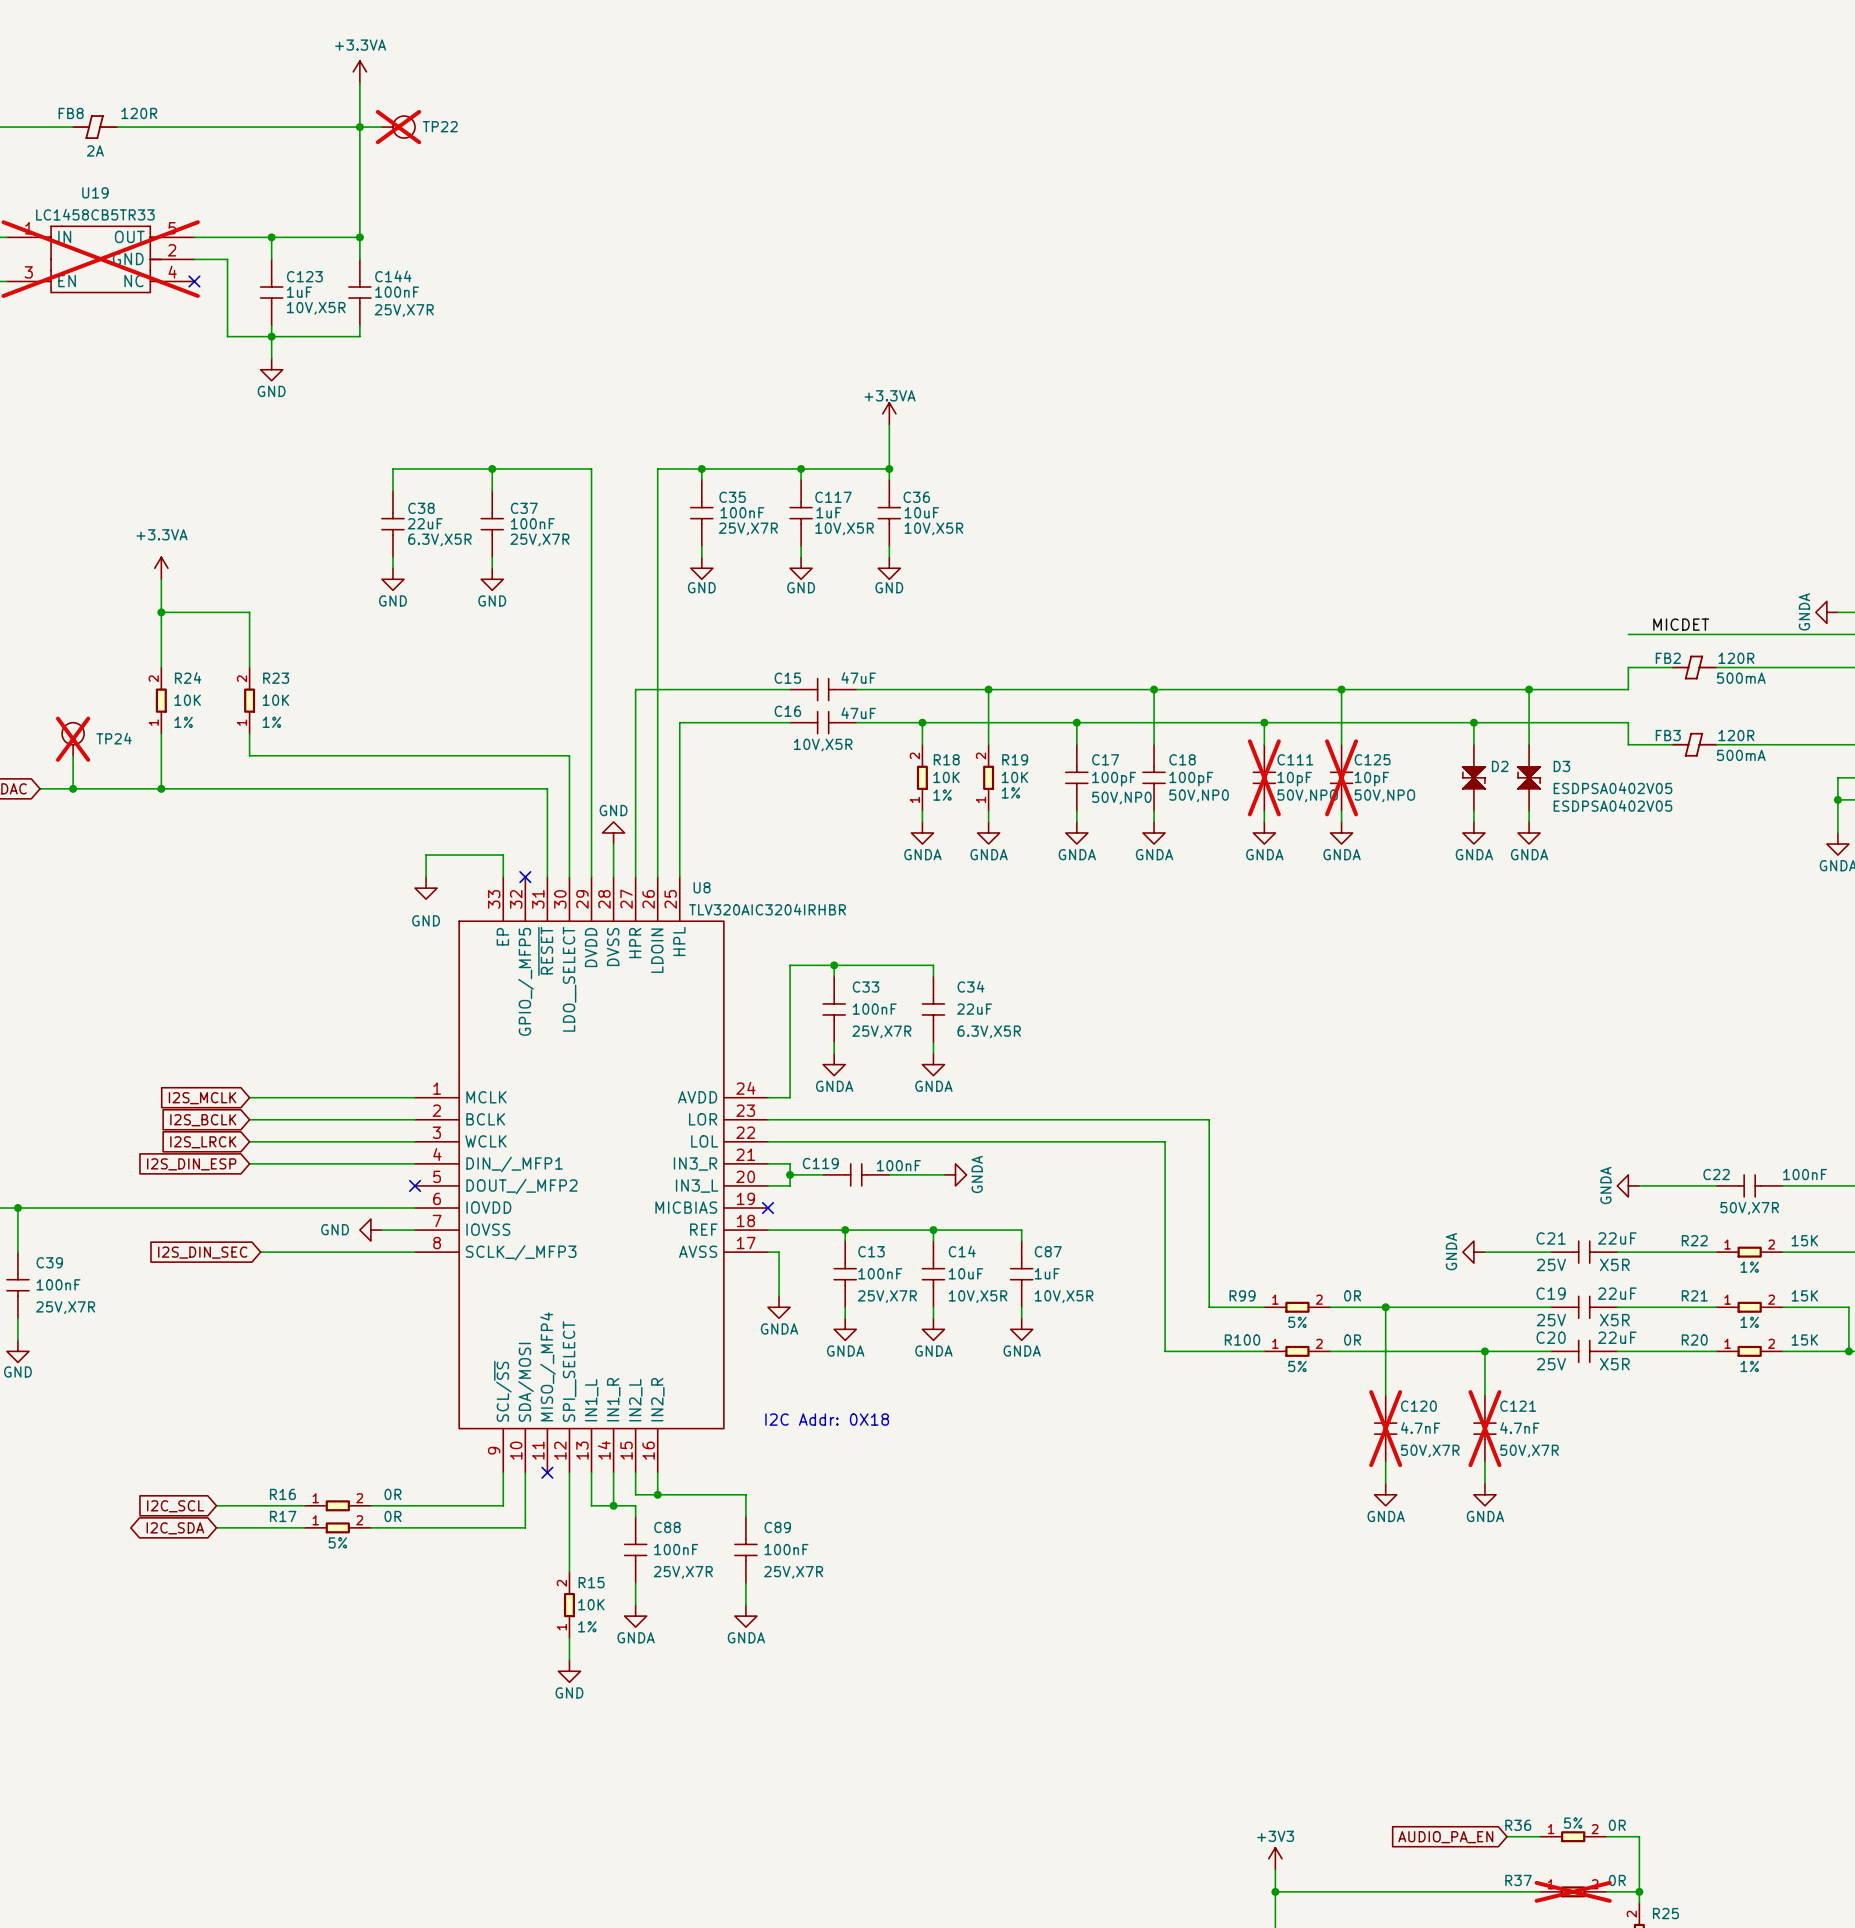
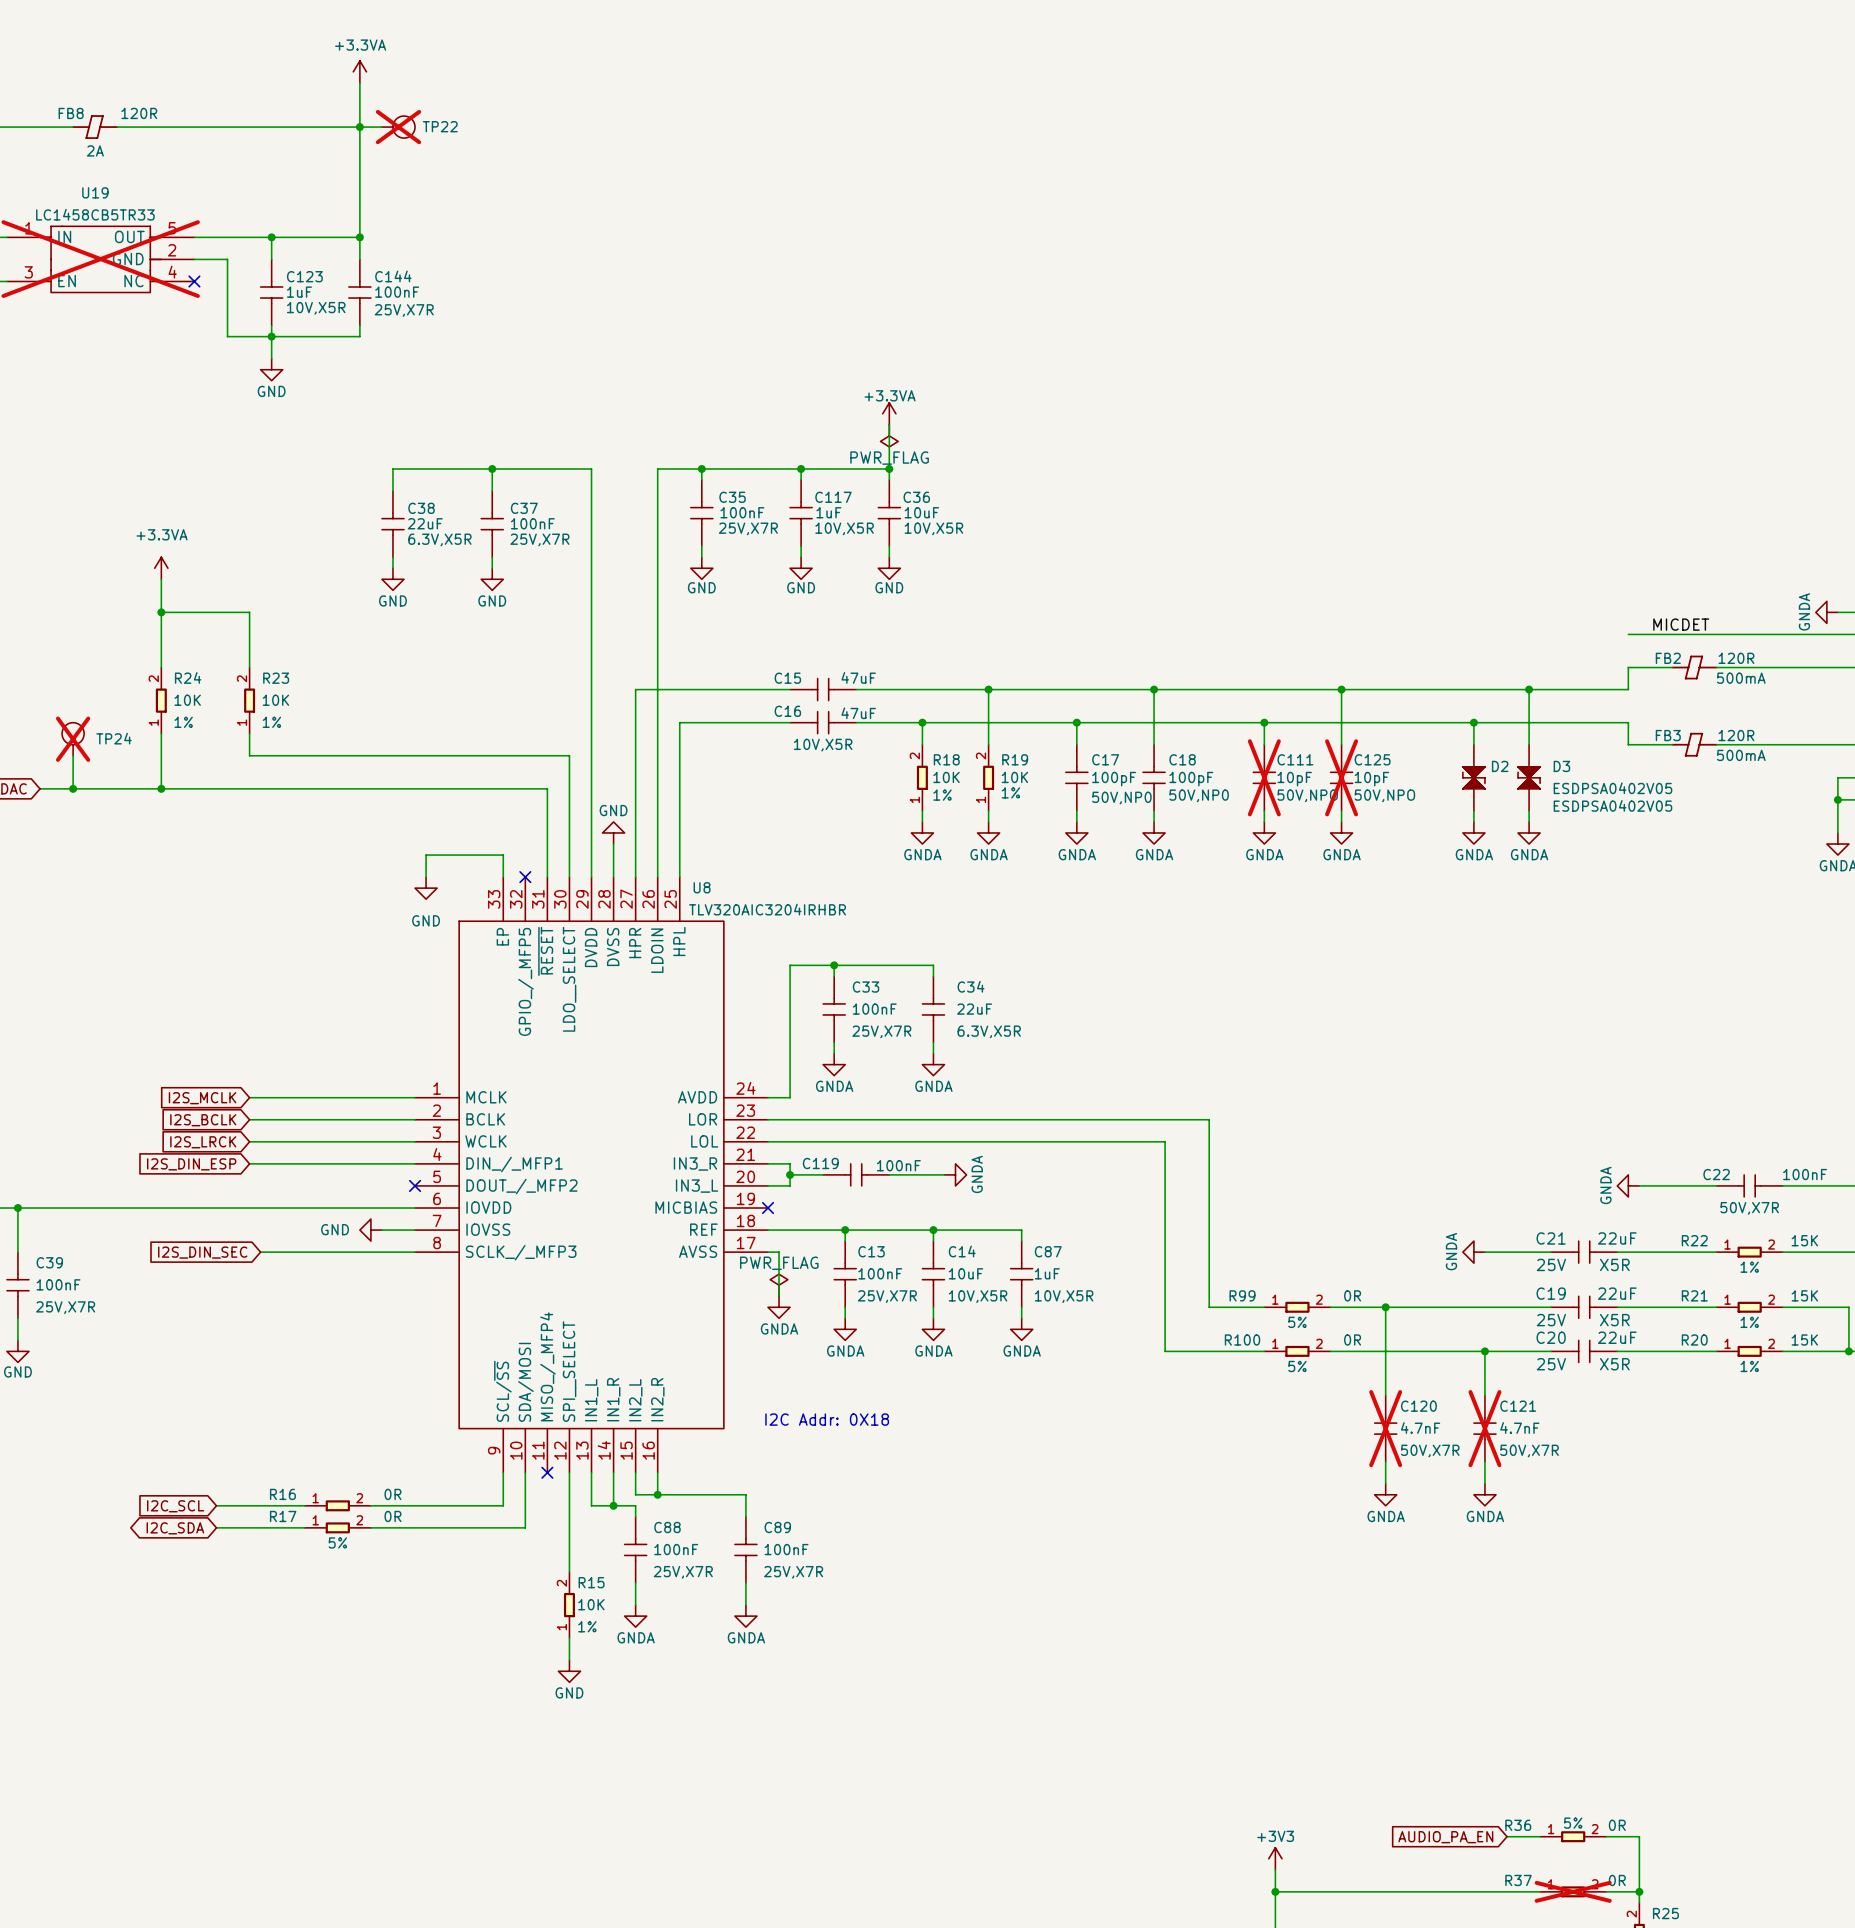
power symbol: none -> PWR_FLAG (889, 435)
power symbol: none -> PWR_FLAG (779, 1285)

